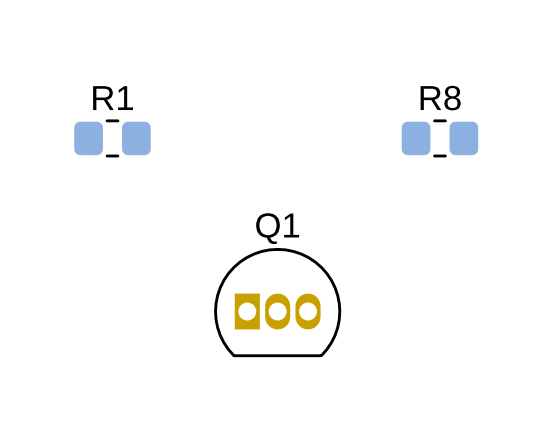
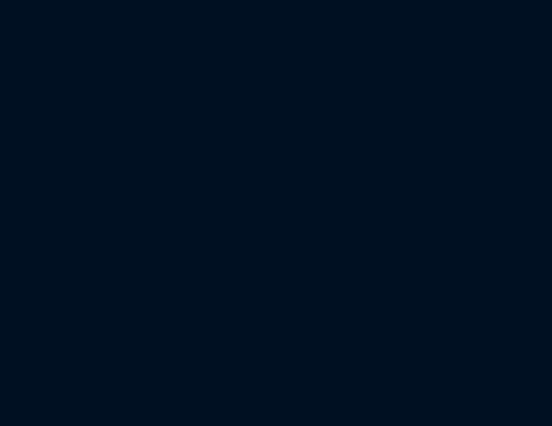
R1: (112, 138) -> none
R8: (439, 138) -> none
Q1: (277, 302) -> none

